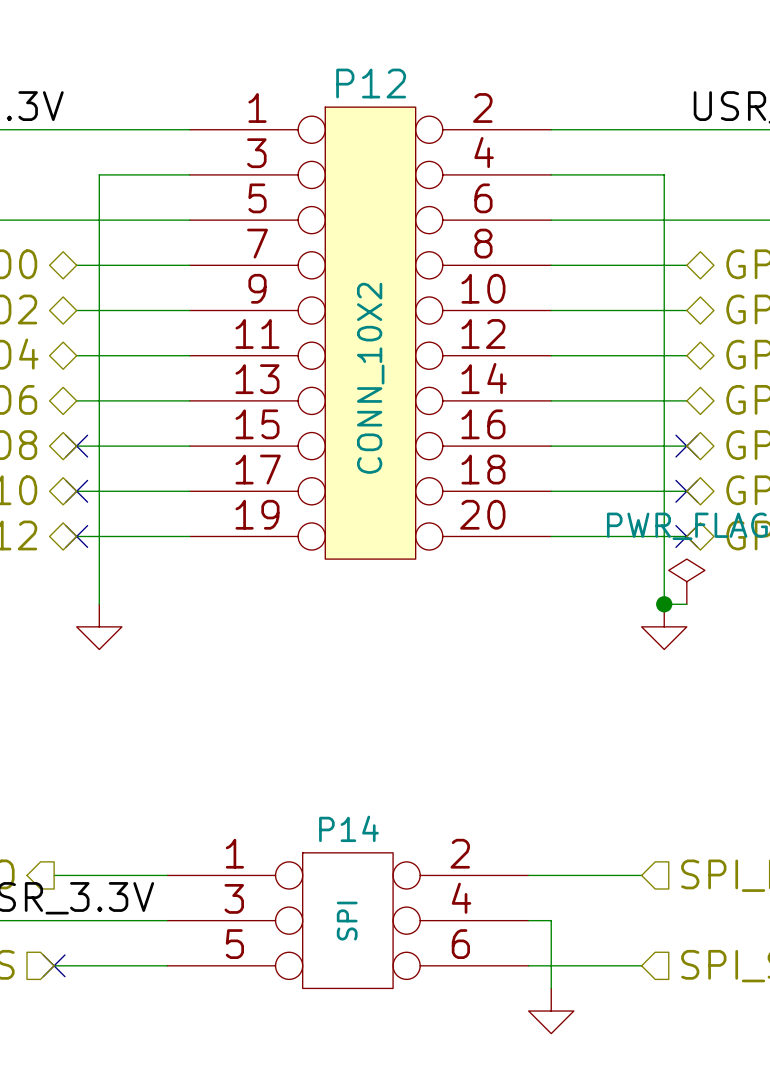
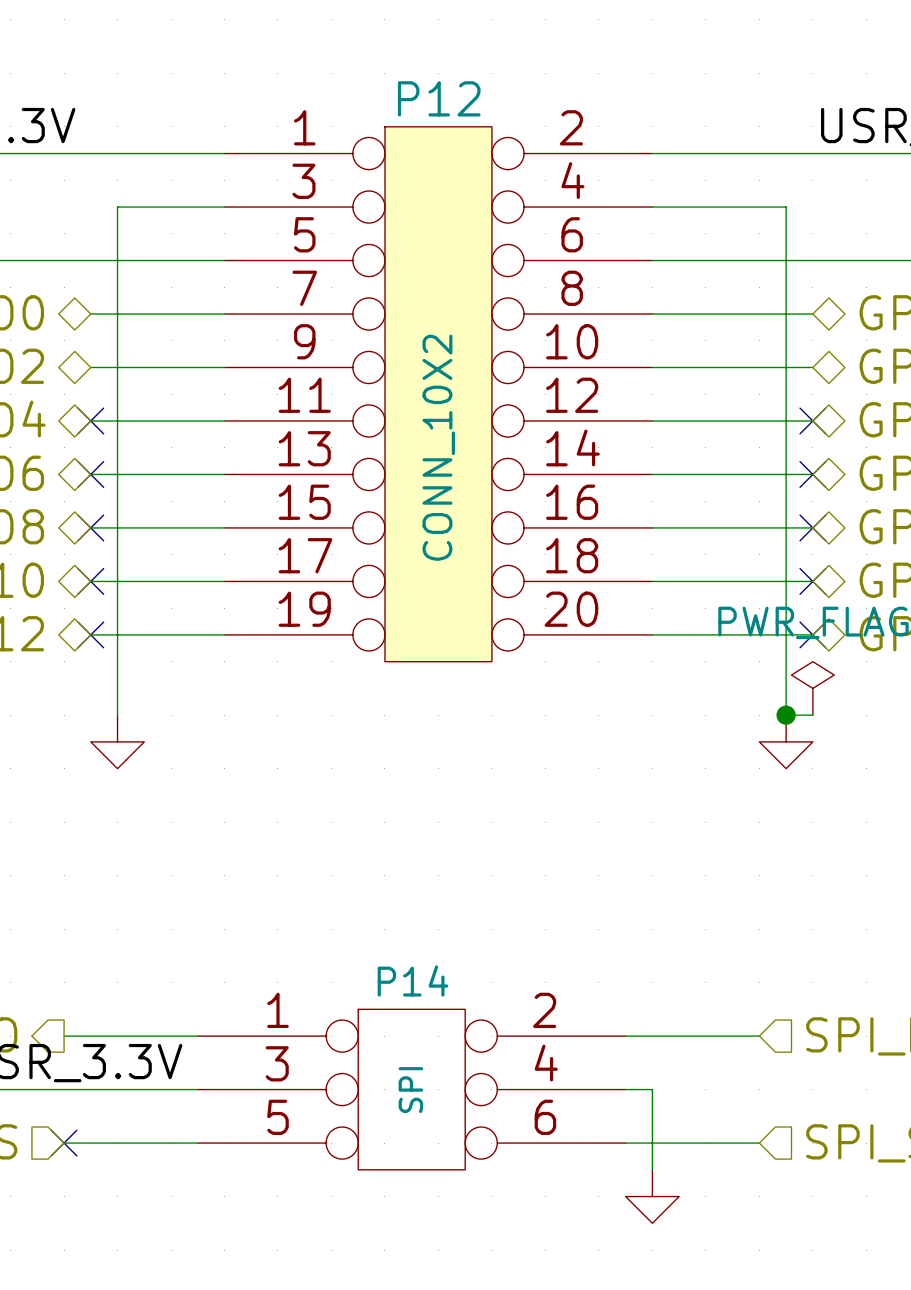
no-connect mark: none -> (90, 420)
no-connect mark: none -> (812, 420)
no-connect mark: none -> (90, 474)
no-connect mark: none -> (812, 474)

